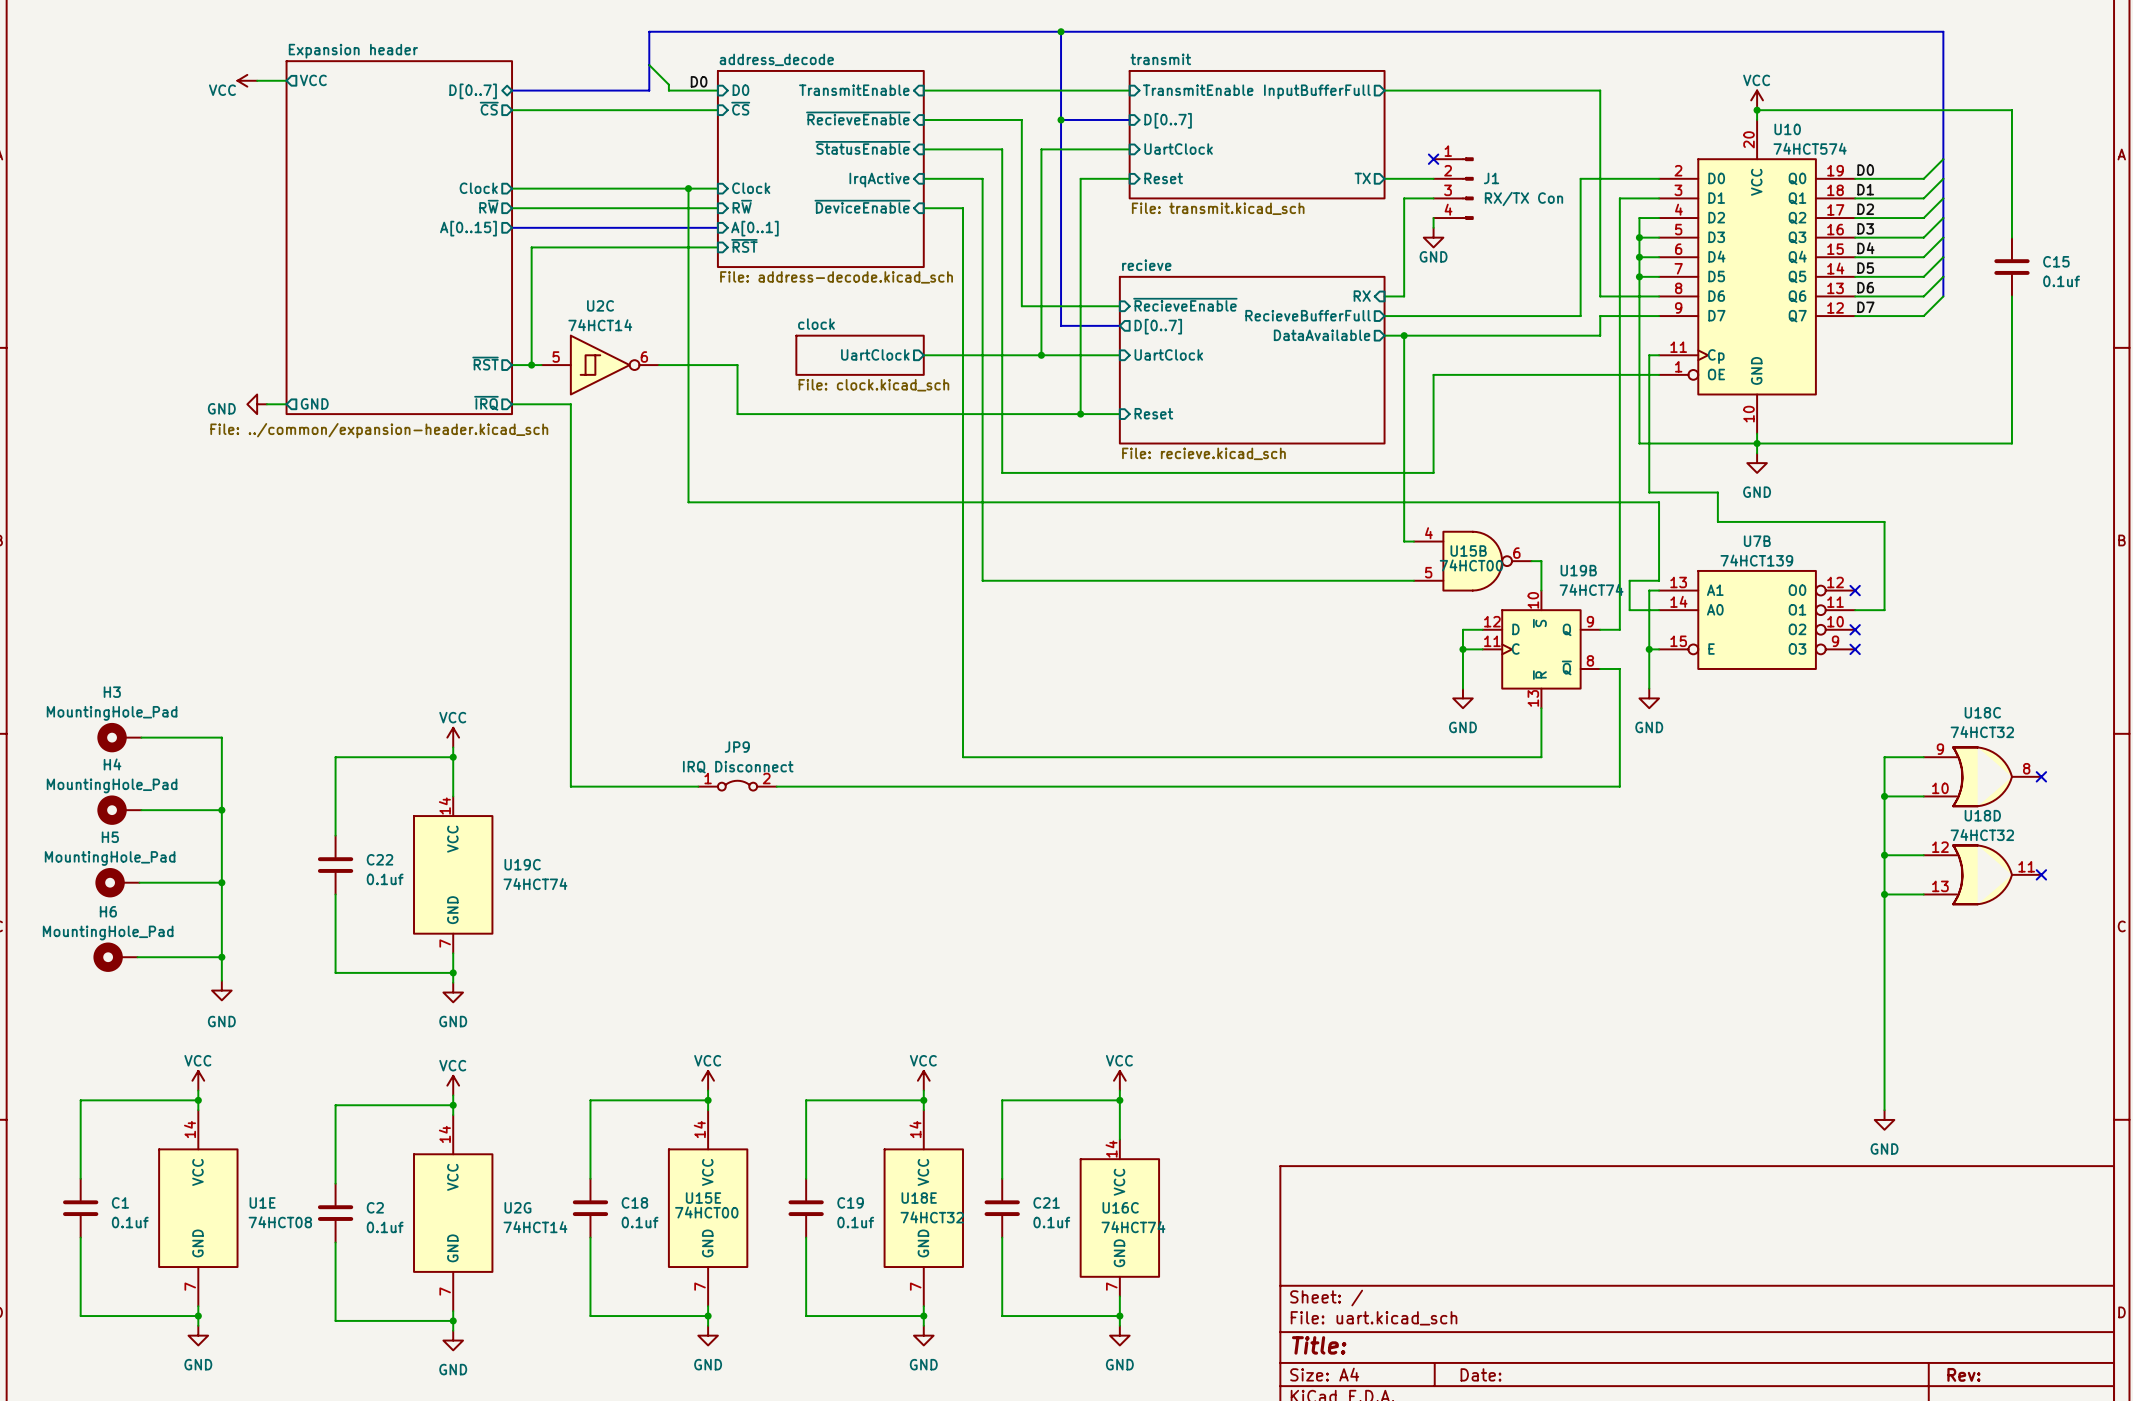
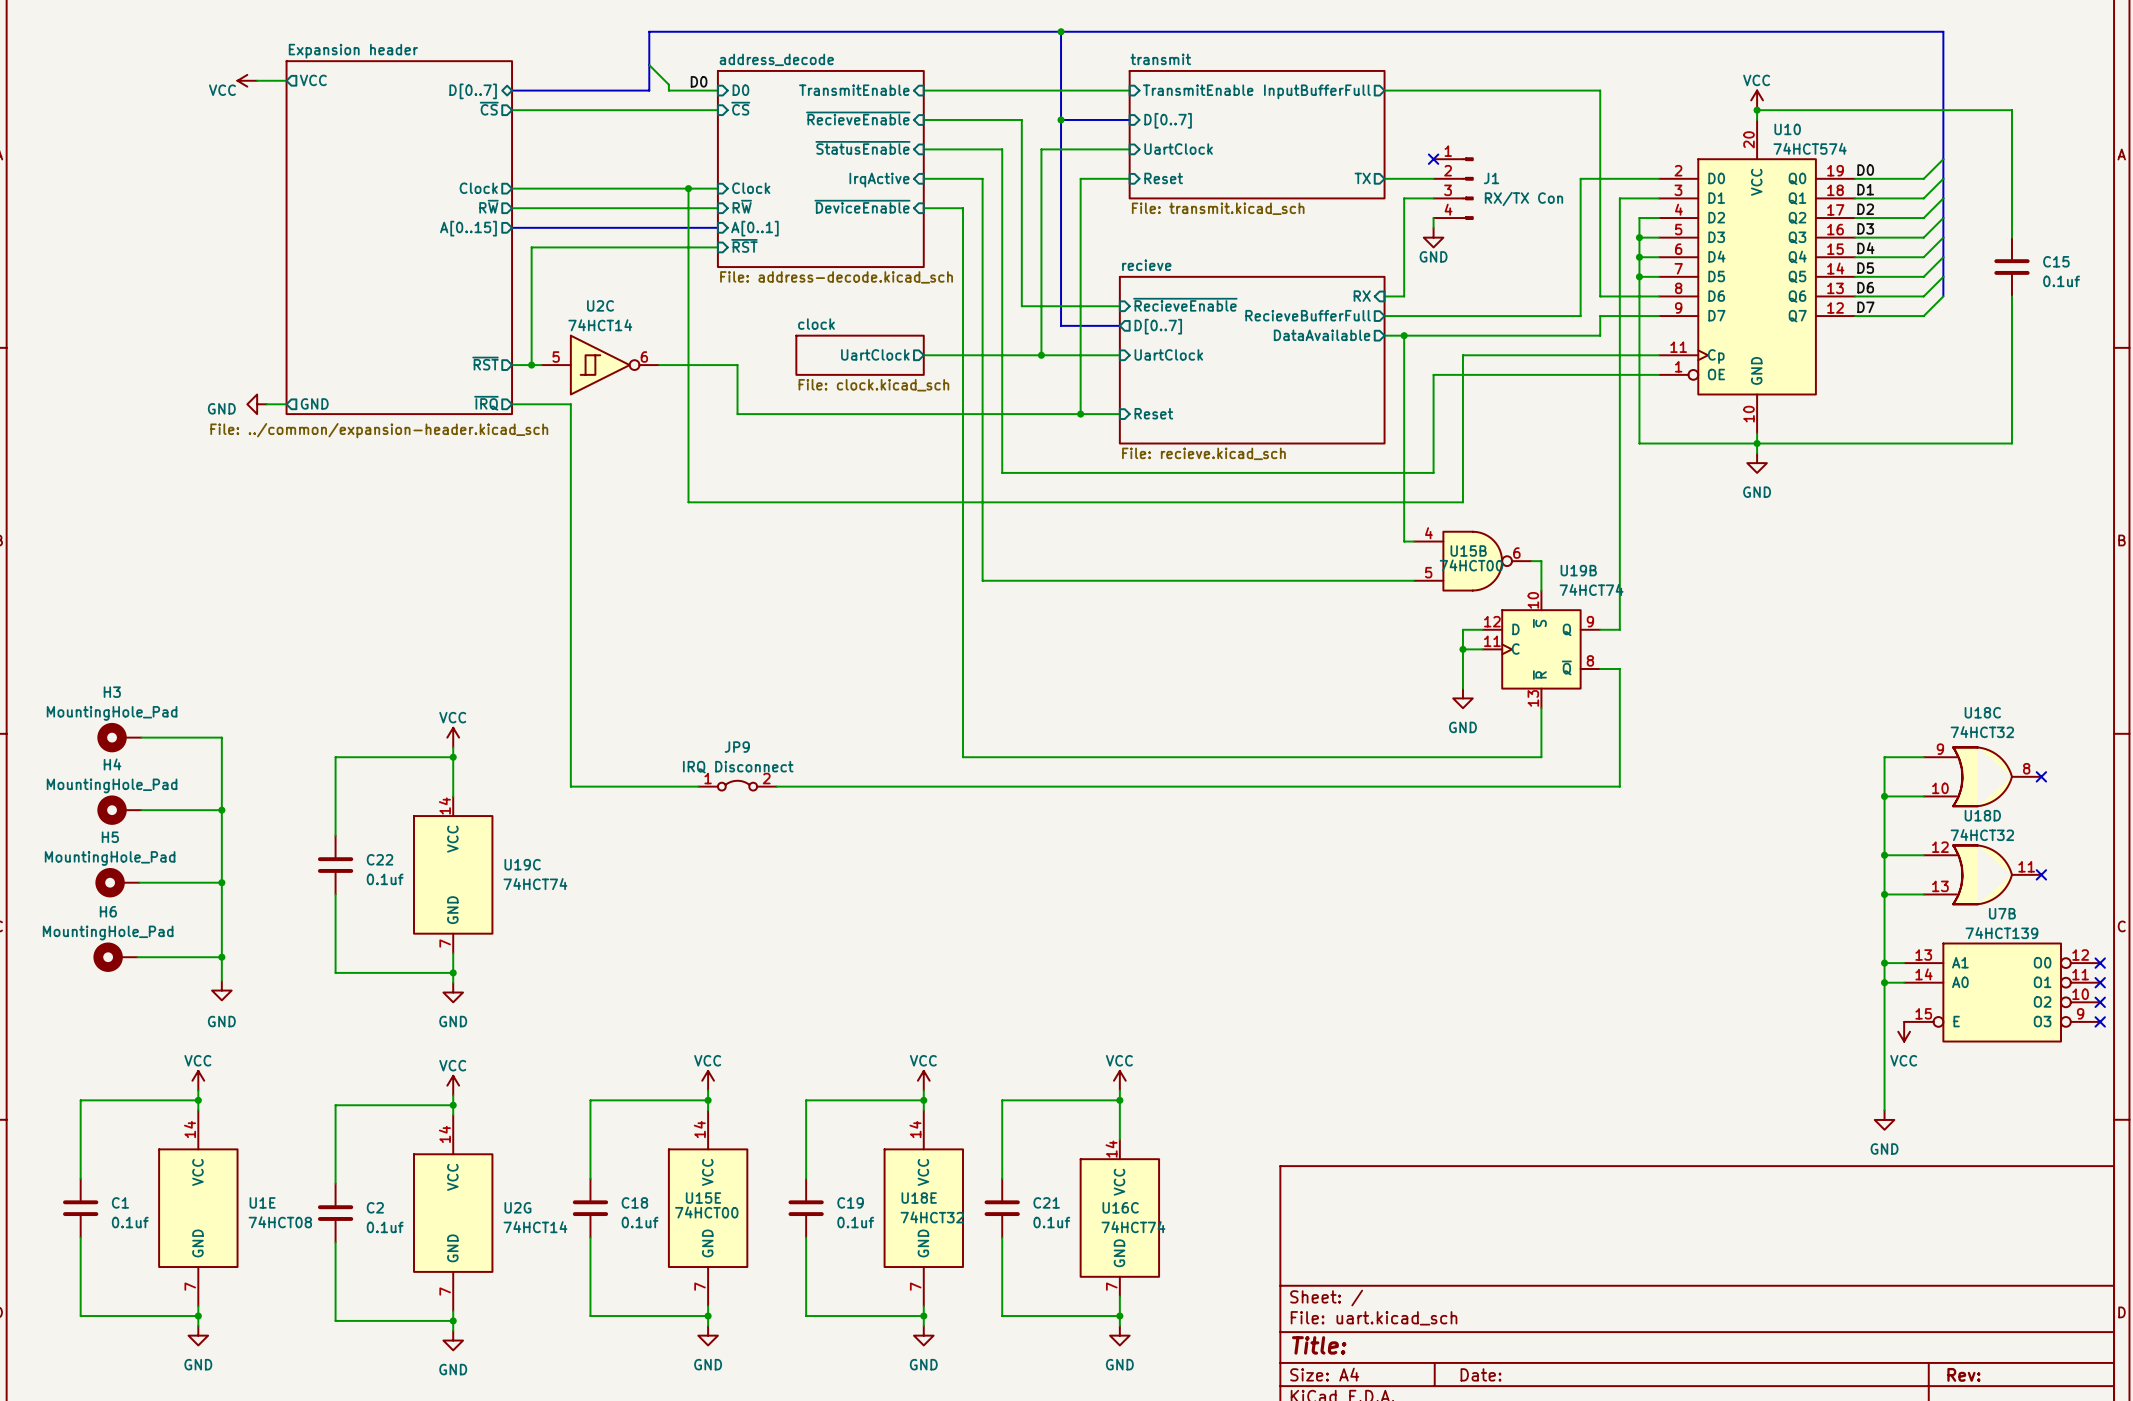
wire: (1649, 355) (1649, 492) (1717, 492) (1717, 521) (1884, 521) (1884, 610) (1855, 610) -> none
wire: (1462, 502) (1659, 502) (1659, 580) (1629, 580) (1629, 610) (1659, 610) -> (1462, 502) (1462, 355) (1649, 355)
wire: (1659, 590) (1649, 590) (1649, 688) -> none
no-connect mark: (1855, 590) -> none
U7B position: (1757, 619) -> (2002, 992)
no-connect mark: (1855, 629) -> none
wire: (1649, 649) (1659, 649) -> none
junction: (1649, 649) -> none
no-connect mark: (1855, 649) -> none
power symbol: GND (1649, 698) -> none
wire: none -> (1884, 963) (1904, 963)
junction: none -> (1884, 963)
no-connect mark: none -> (2100, 963)
wire: none -> (1884, 982) (1904, 982)
junction: none -> (1884, 982)
no-connect mark: none -> (2100, 982)
no-connect mark: none -> (2100, 1002)
no-connect mark: none -> (2100, 1021)
power symbol: none -> VCC (1904, 1031)

